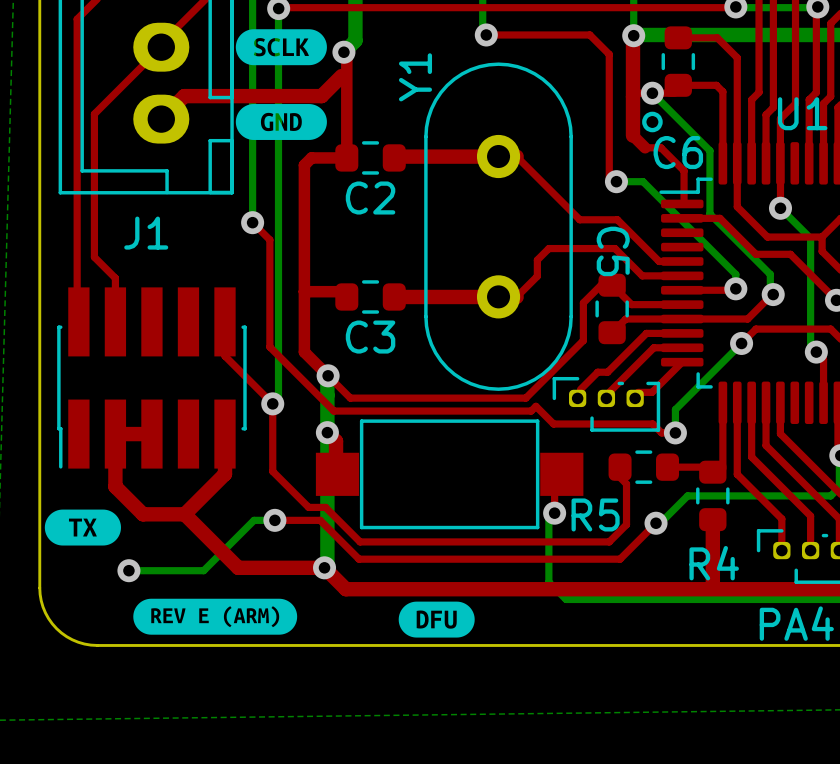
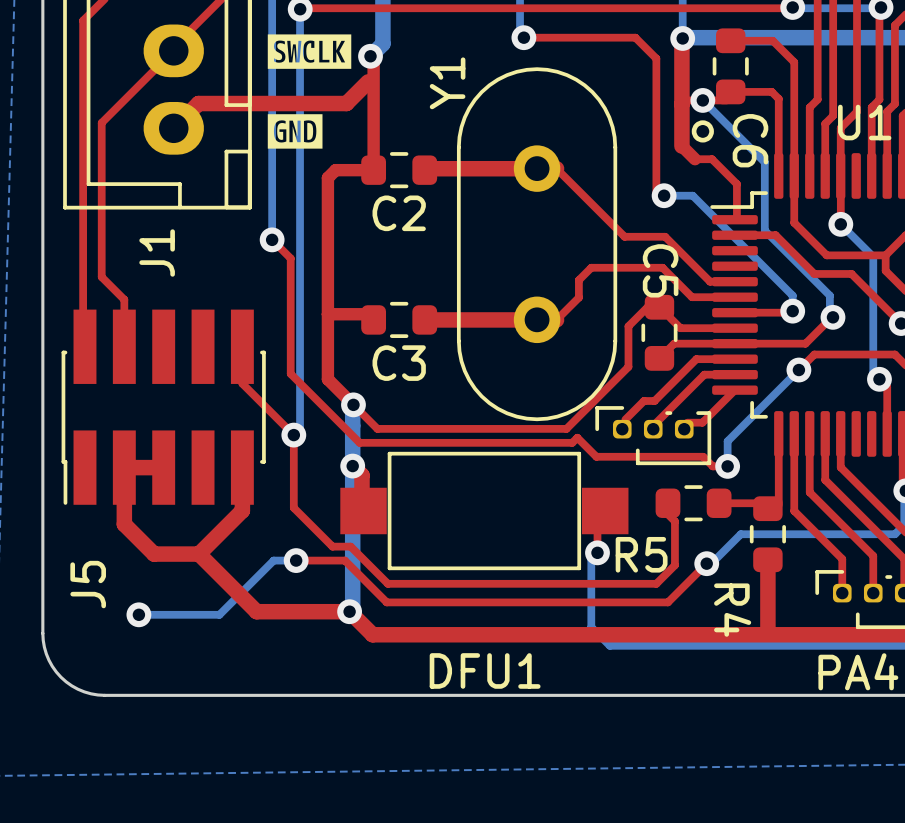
drawing shape: [235, 29, 327, 66] -> [267, 34, 352, 69]
drawing shape: [235, 104, 327, 140] -> [267, 114, 323, 149]
C6 name rotation: 0° (678, 152) -> 90° clockwise (750, 140)
J1 name rotation: 0° (146, 233) -> 90° counterclockwise (157, 253)
drawing: [44, 509, 121, 546] -> none
J5 name: none -> J5 (88, 584)
R4 name rotation: 0° (714, 563) -> 90° clockwise (732, 610)
drawing: [133, 598, 298, 635] -> none
drawing: [398, 601, 475, 638] -> none
DFU1 name: none -> DFU1 (485, 670)

